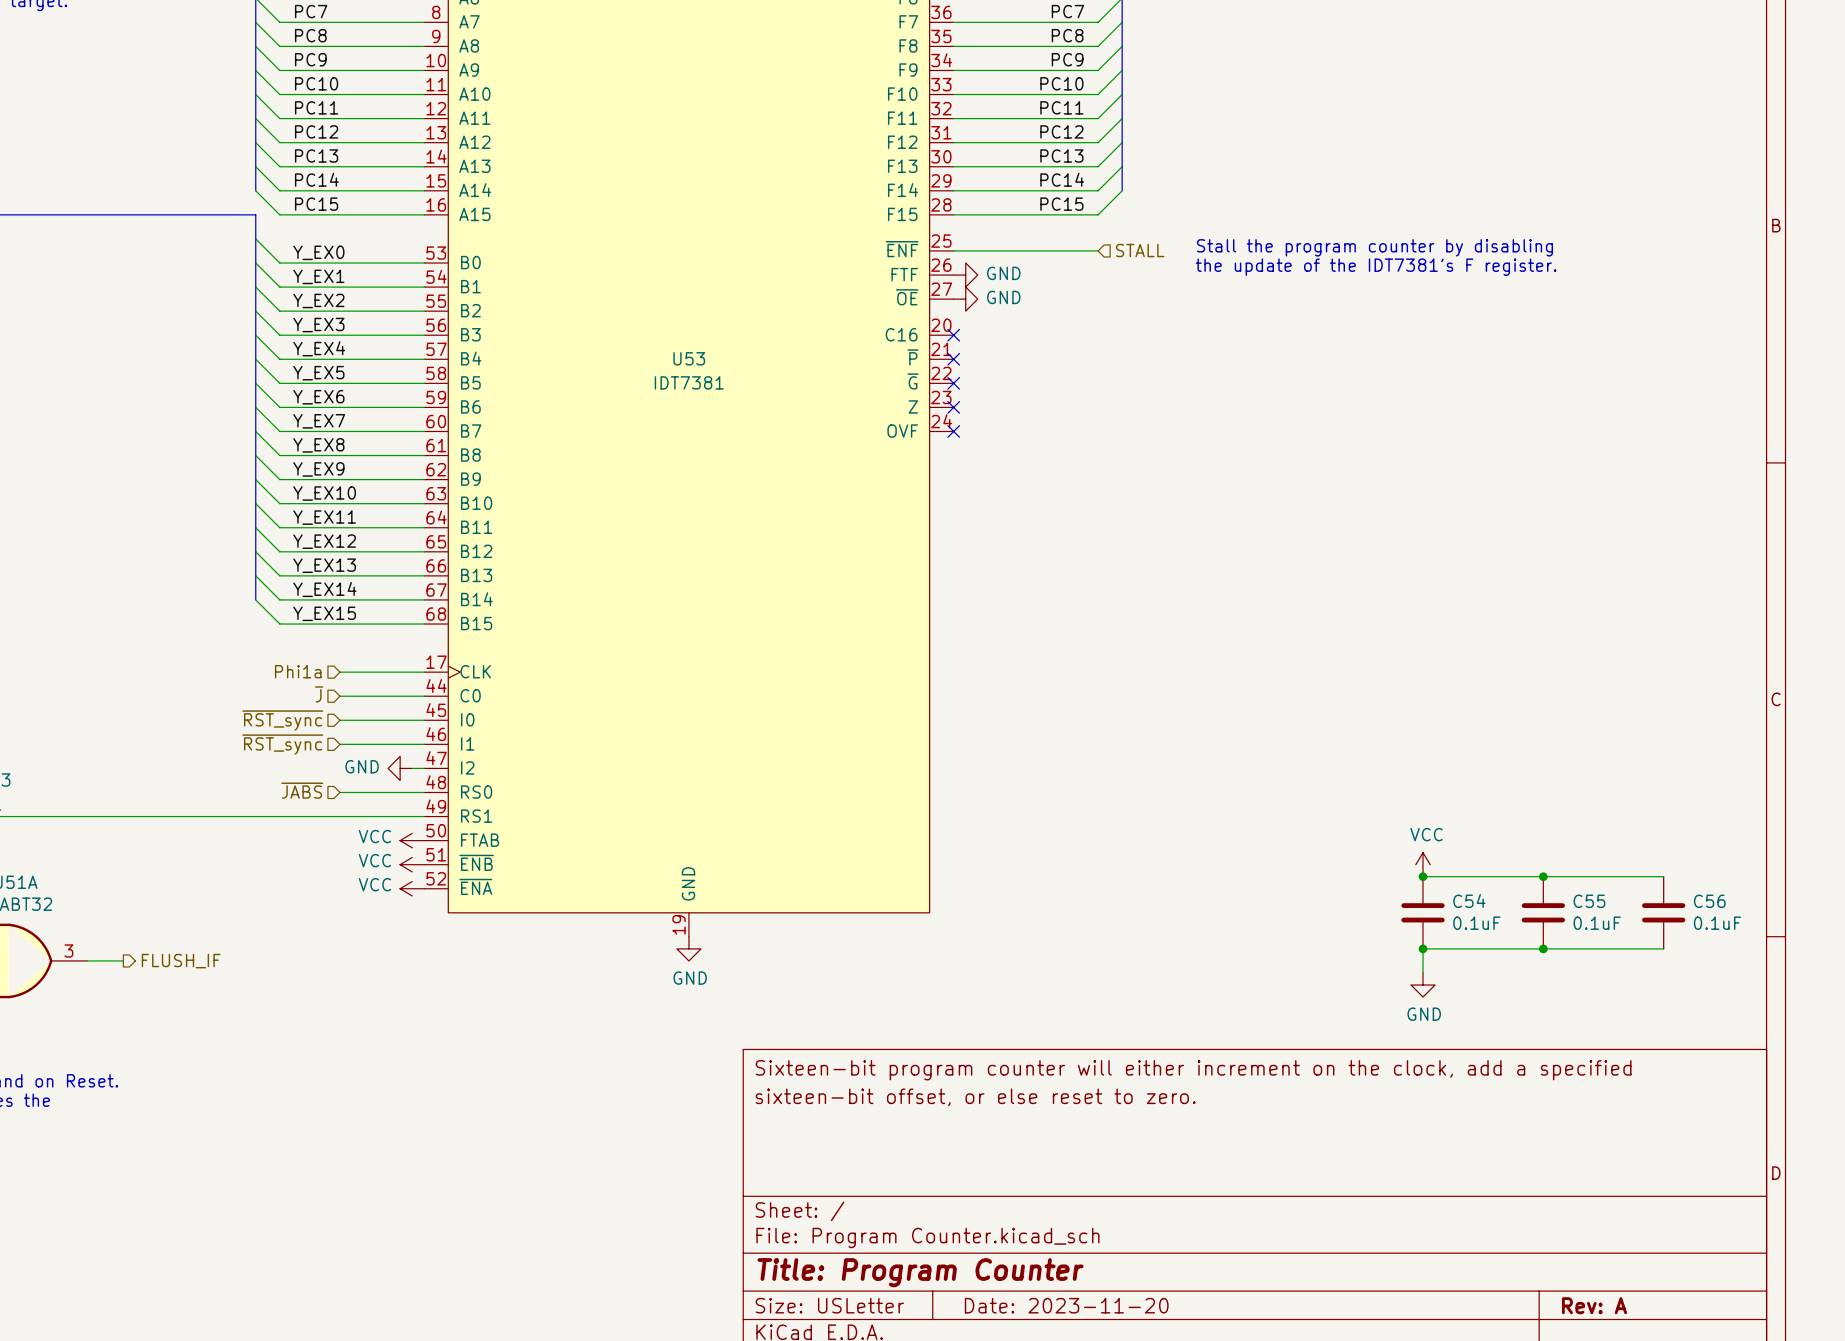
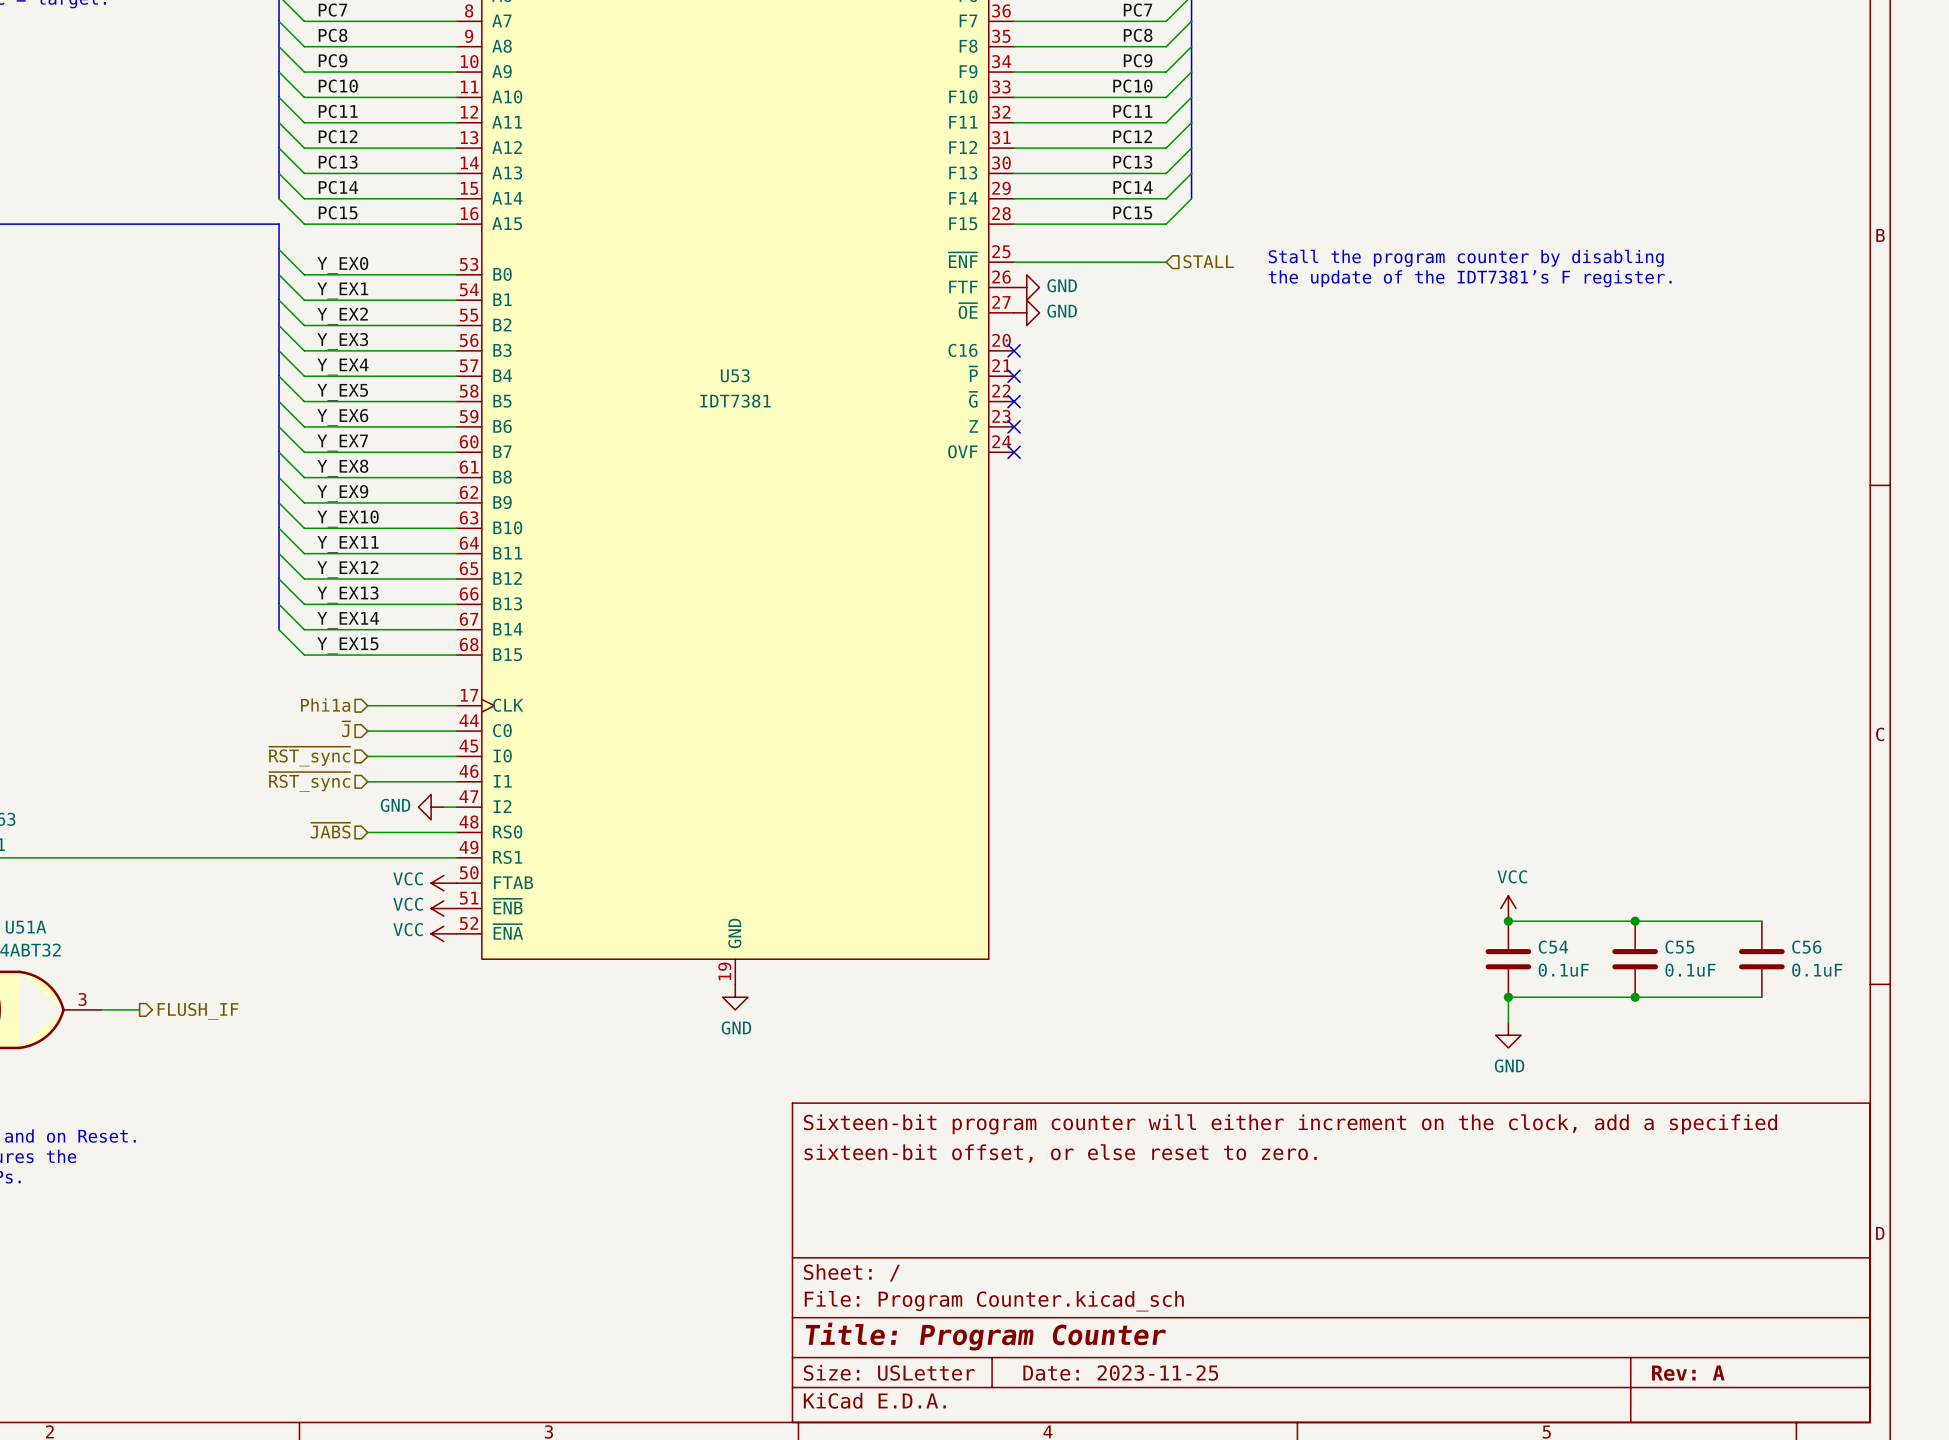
title block: Date: 2023-11-20 (1066, 1305) -> Date: 2023-11-25 (1120, 1373)

